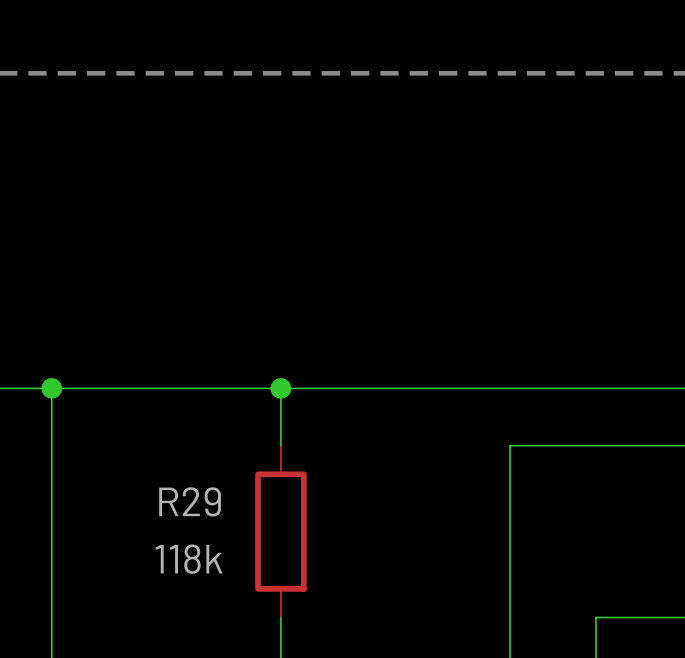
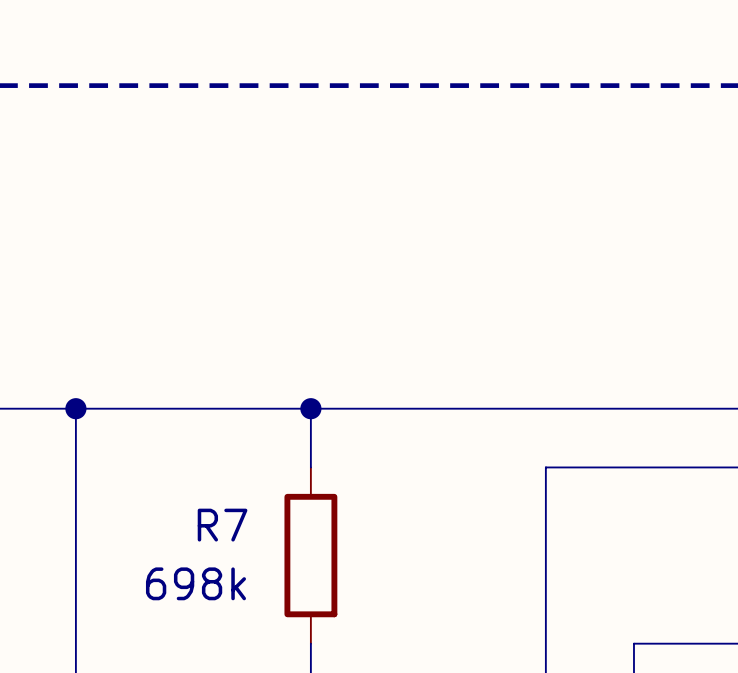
R29 name: R29 (190, 501) -> R7 (222, 525)
R29 value: 118k (188, 559) -> 698k (195, 583)

